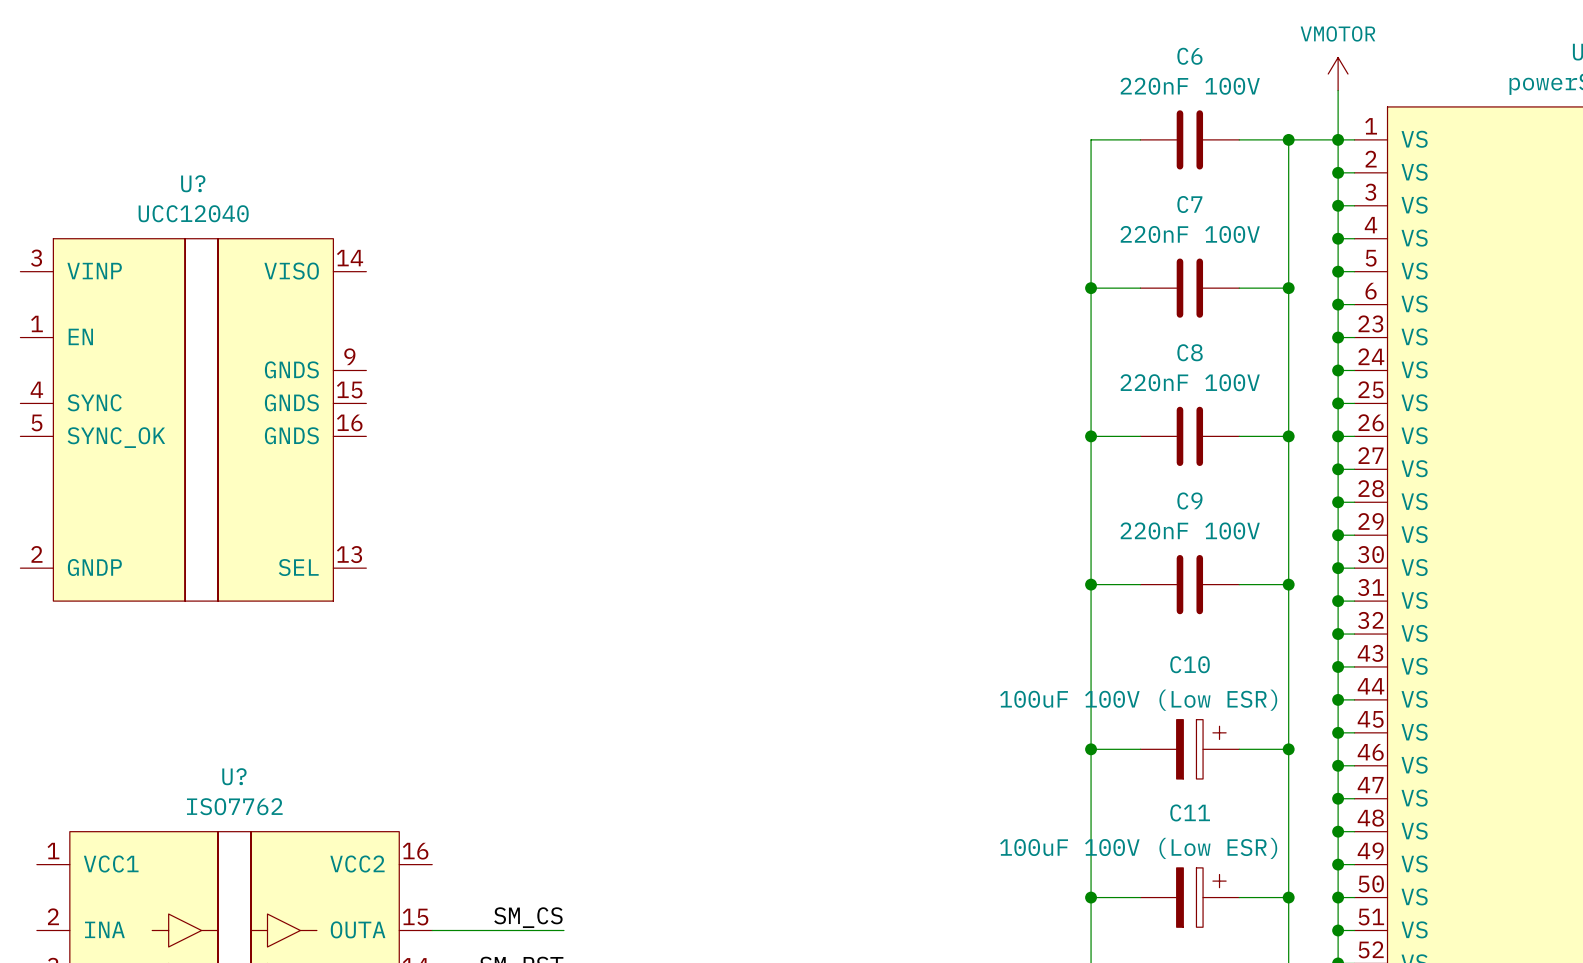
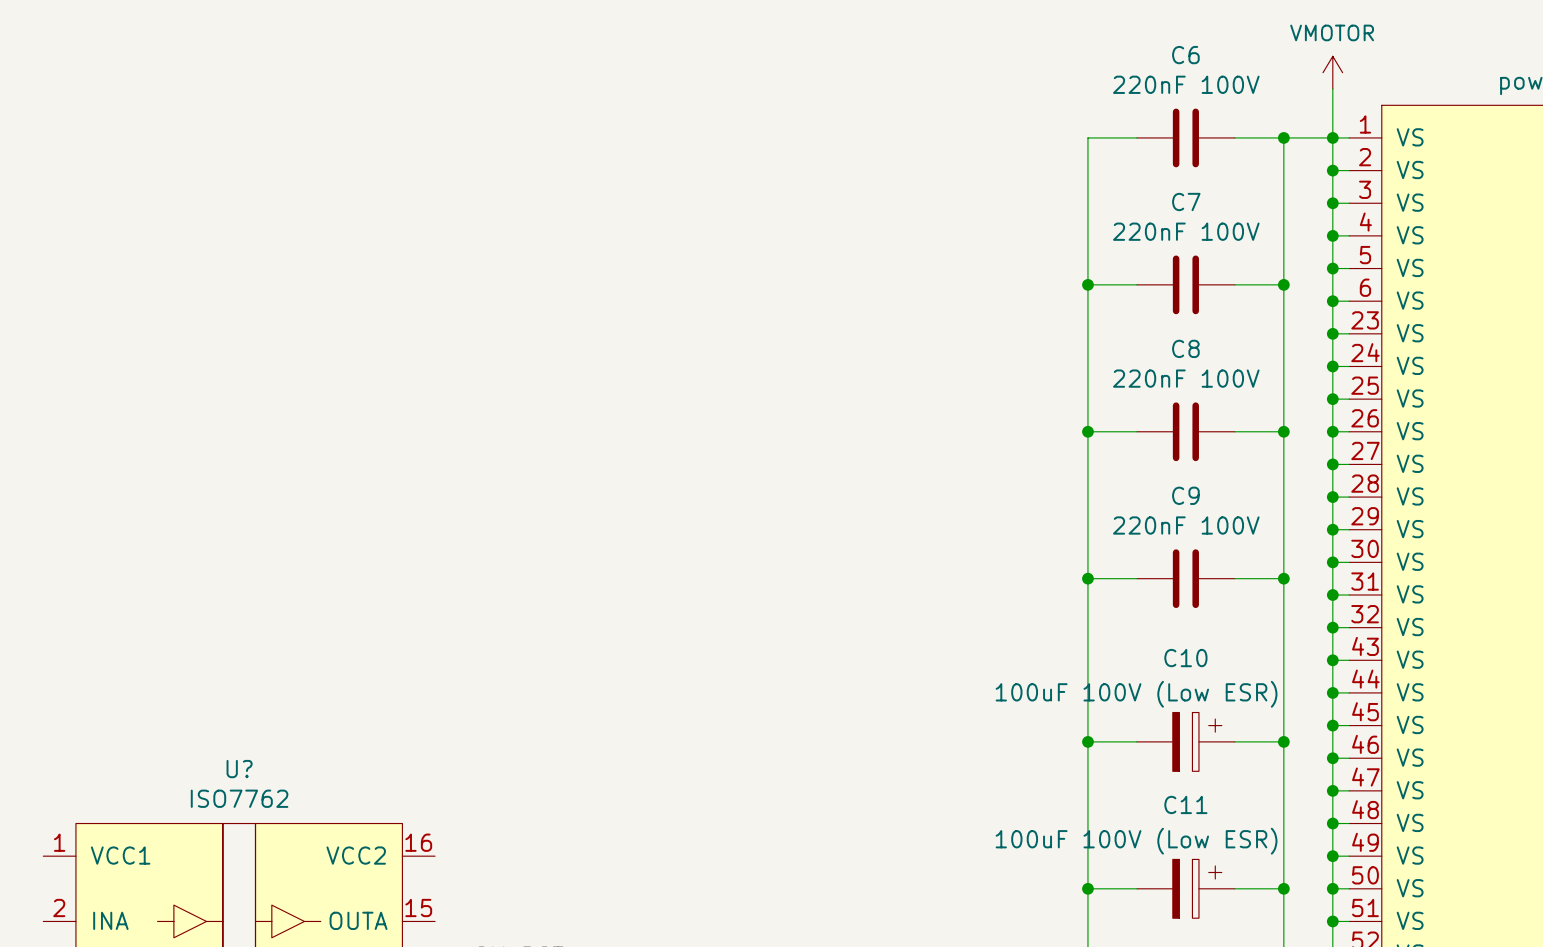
U?: UCC12040 (193, 419) -> none
label: SM_CS (528, 917) -> none
wire: (432, 930) (563, 930) -> none

